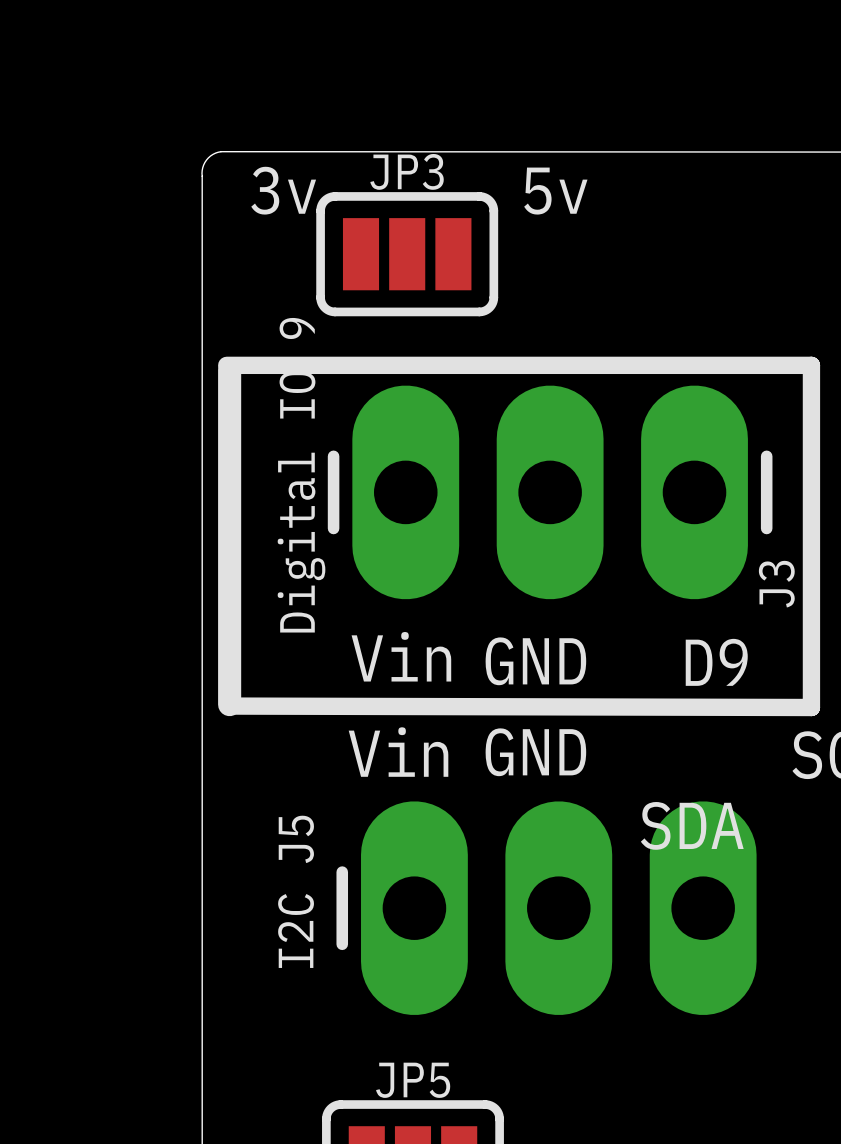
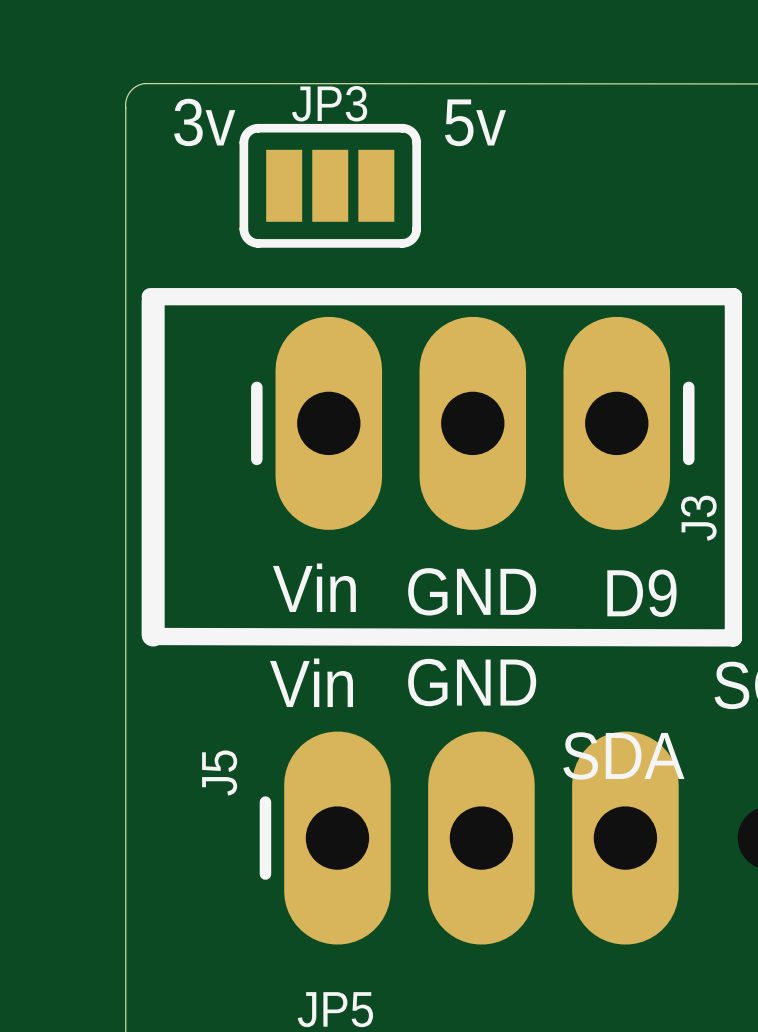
J3 value: Digital IO 9 (301, 475) -> none
J5 value: I2C (296, 931) -> none

